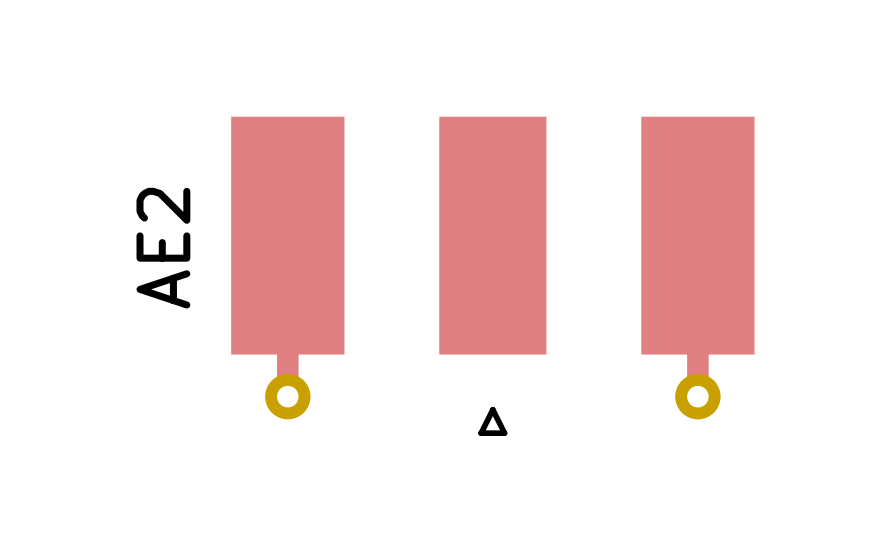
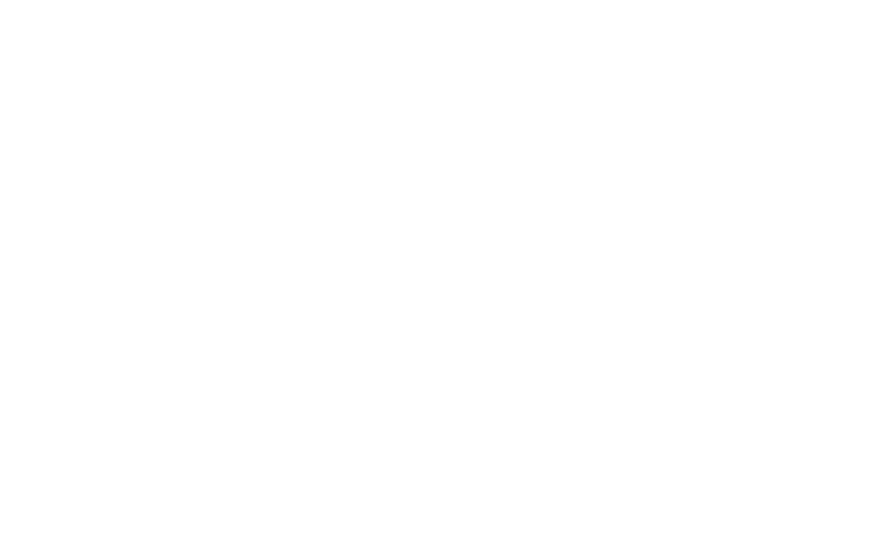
AE2: (492, 276) -> none

